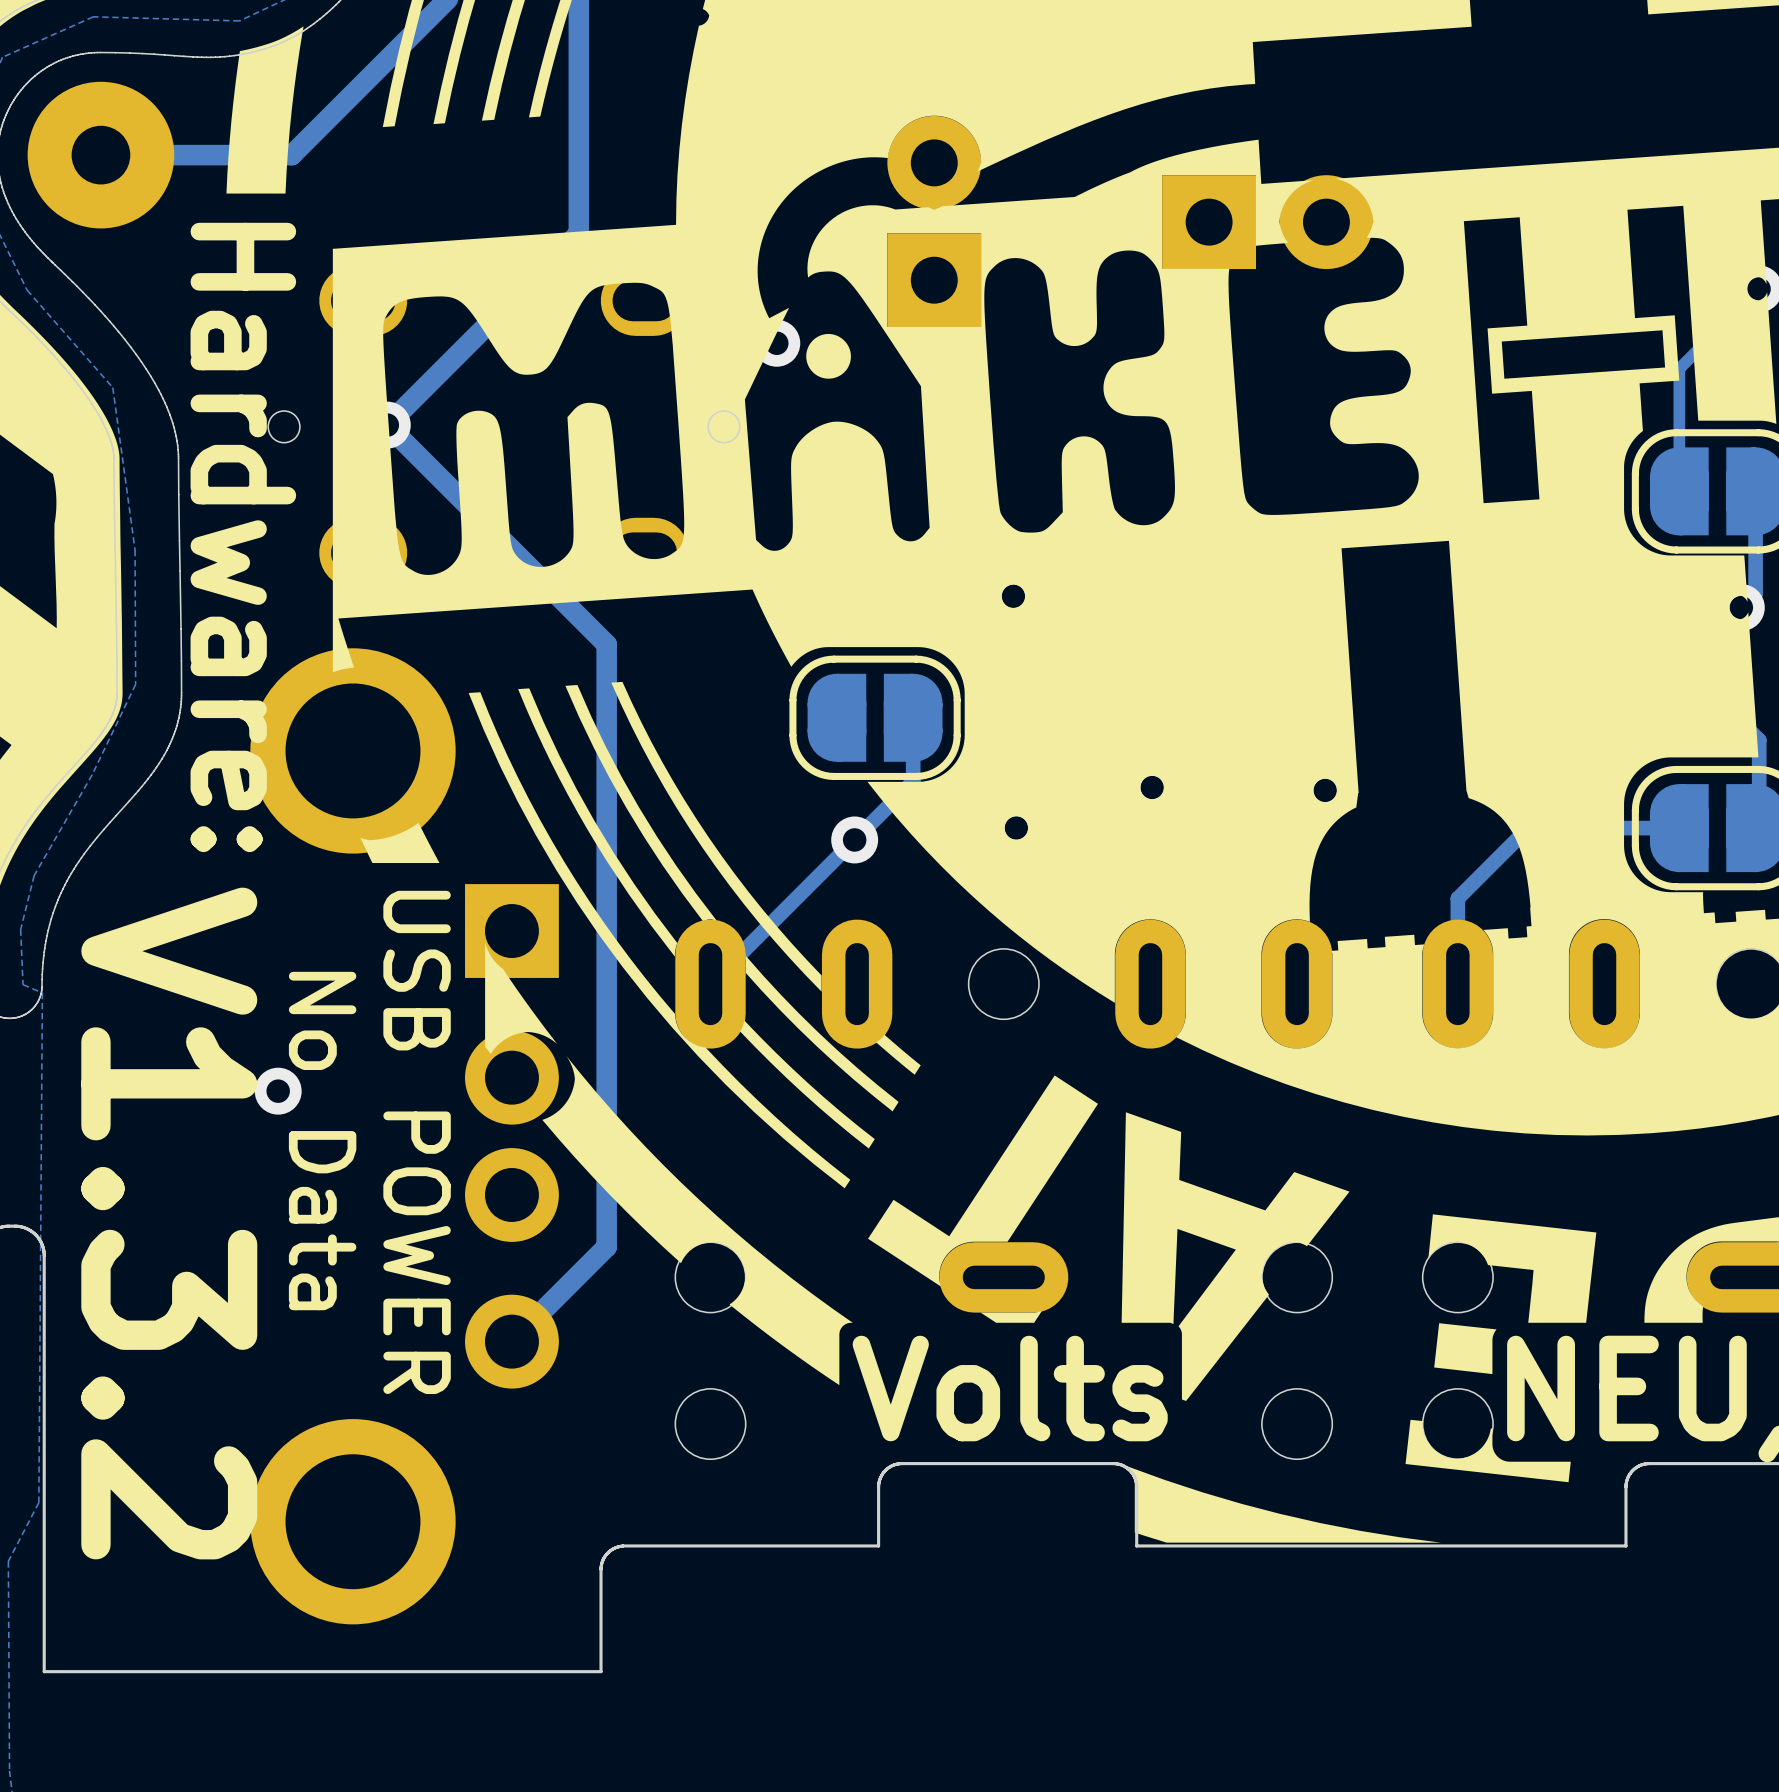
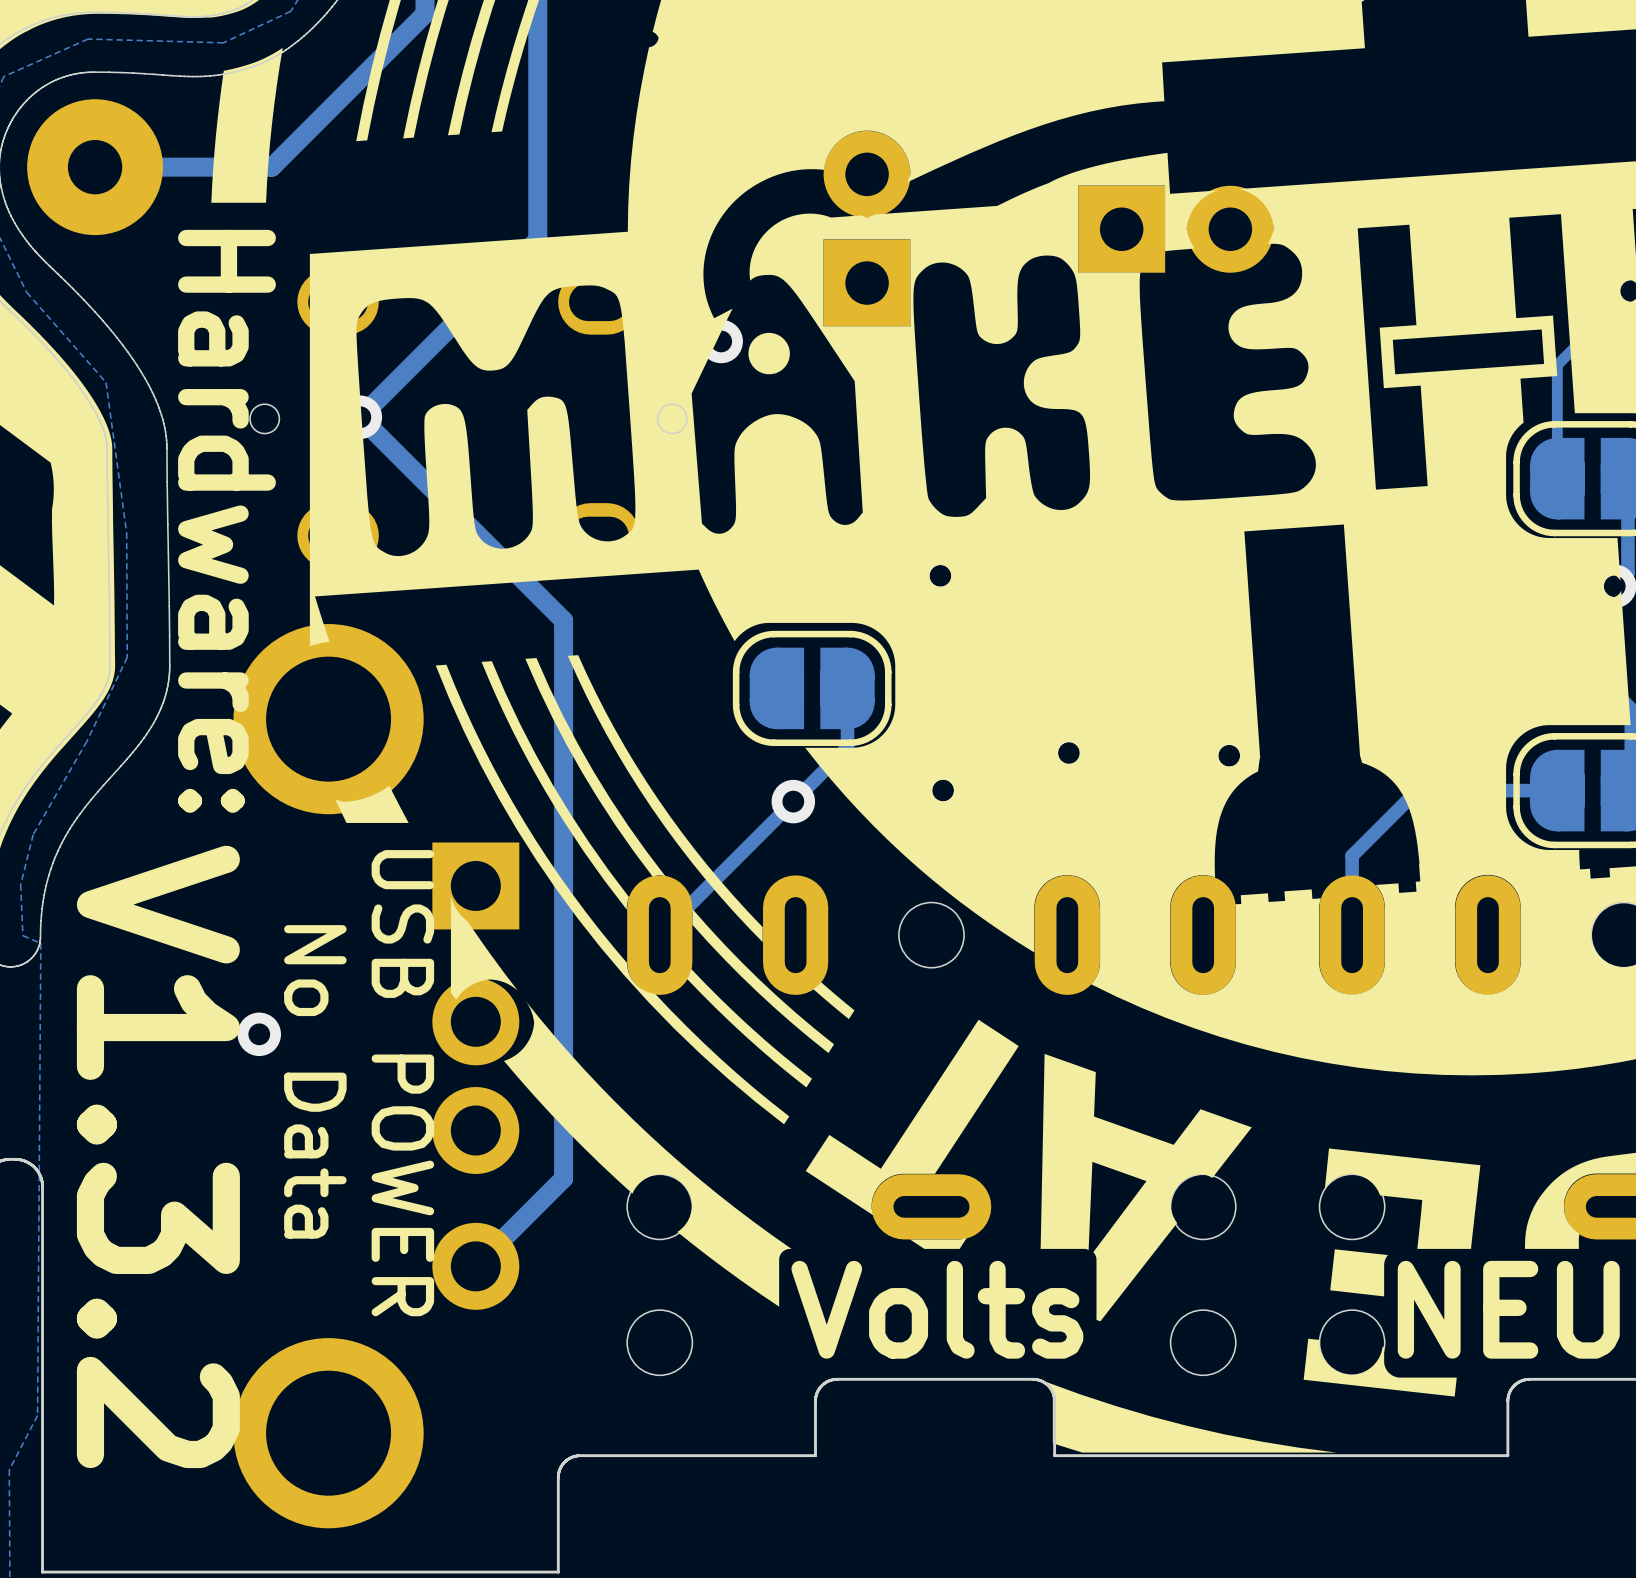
text position: No Data (322, 1141) -> No Data (315, 1081)
text position: USB POWER (417, 1142) -> USB POWER (402, 1083)

